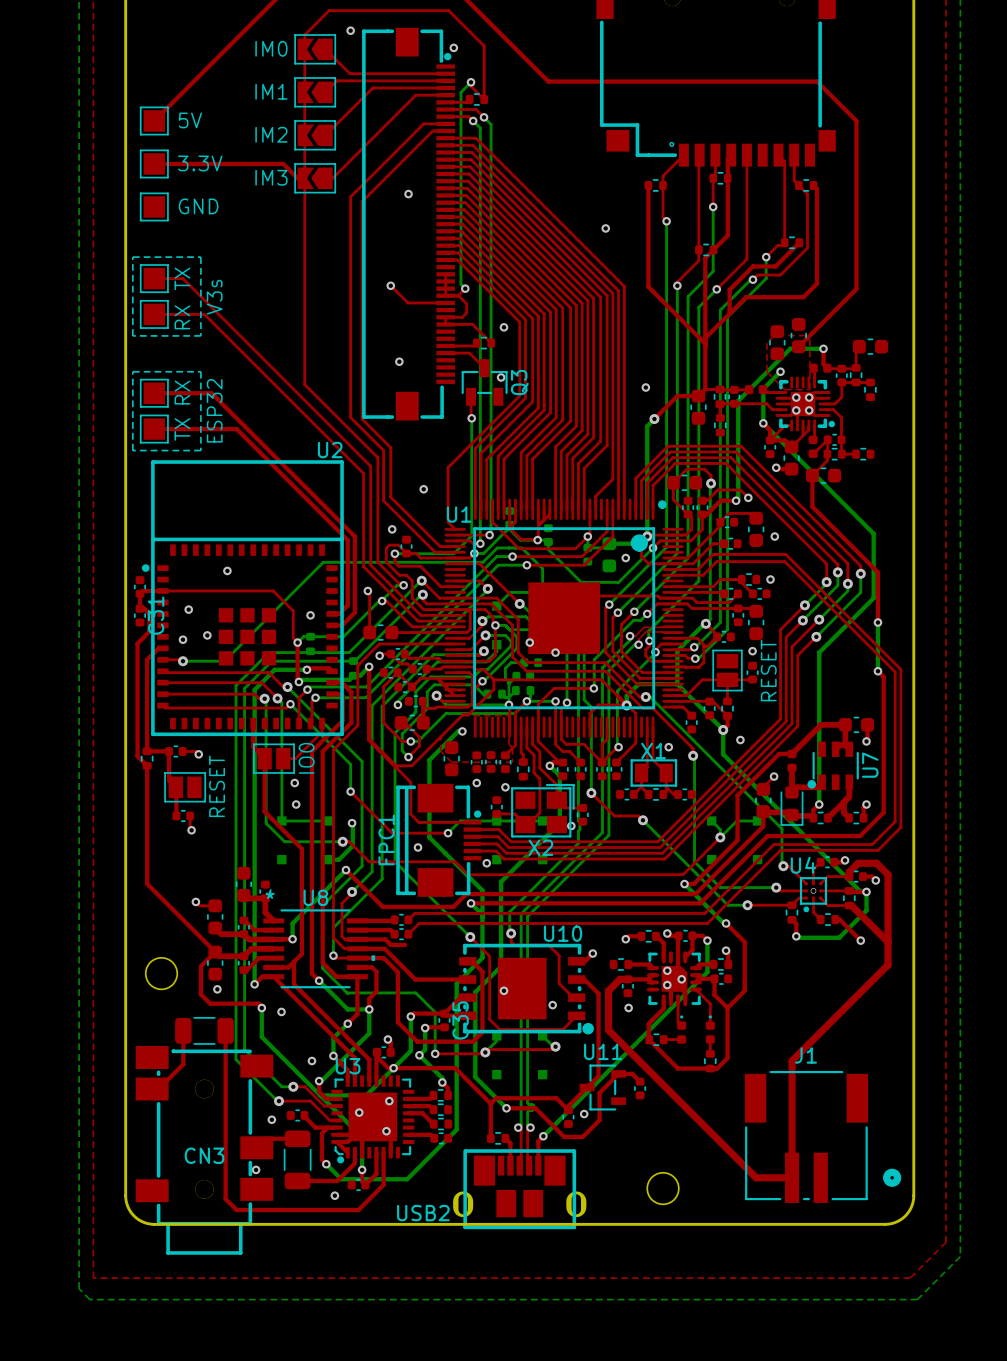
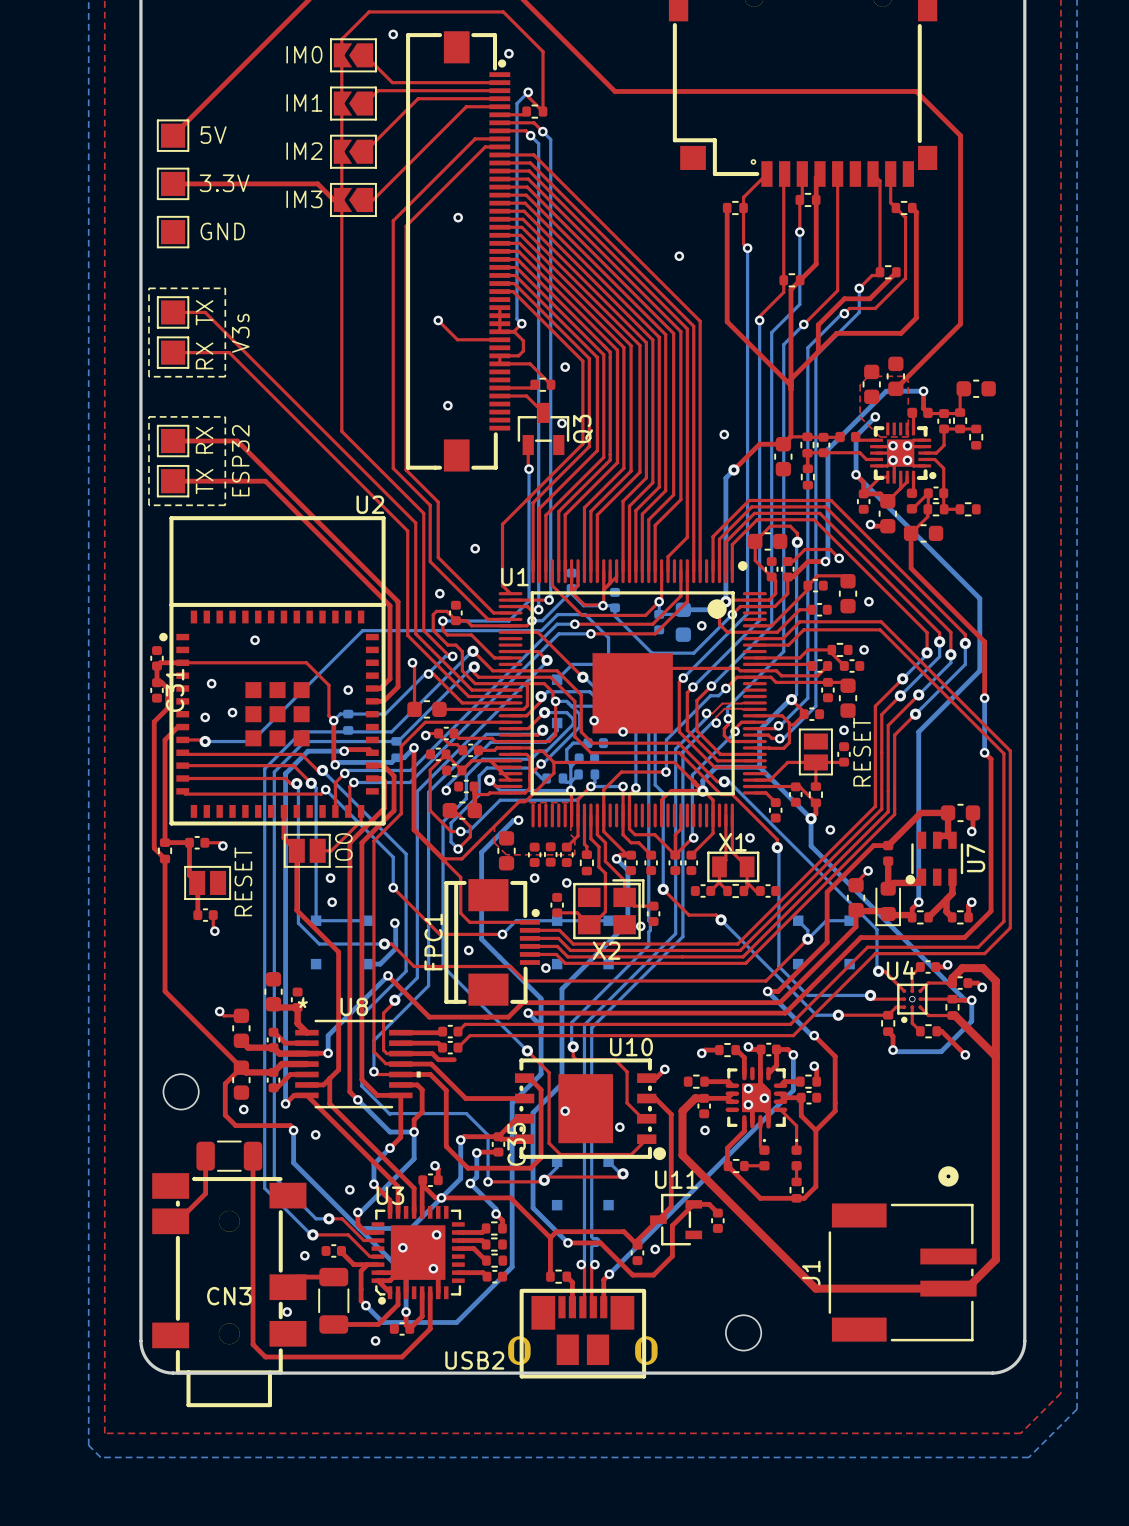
top track: (888, 965) (792, 1060) (792, 1177) (756, 1177) (727, 1149) -> (995, 1082) (995, 1259) (966, 1288) (815, 1288)
J1 rotation: 0° (823, 1136) -> 90° counterclockwise (902, 1253)

